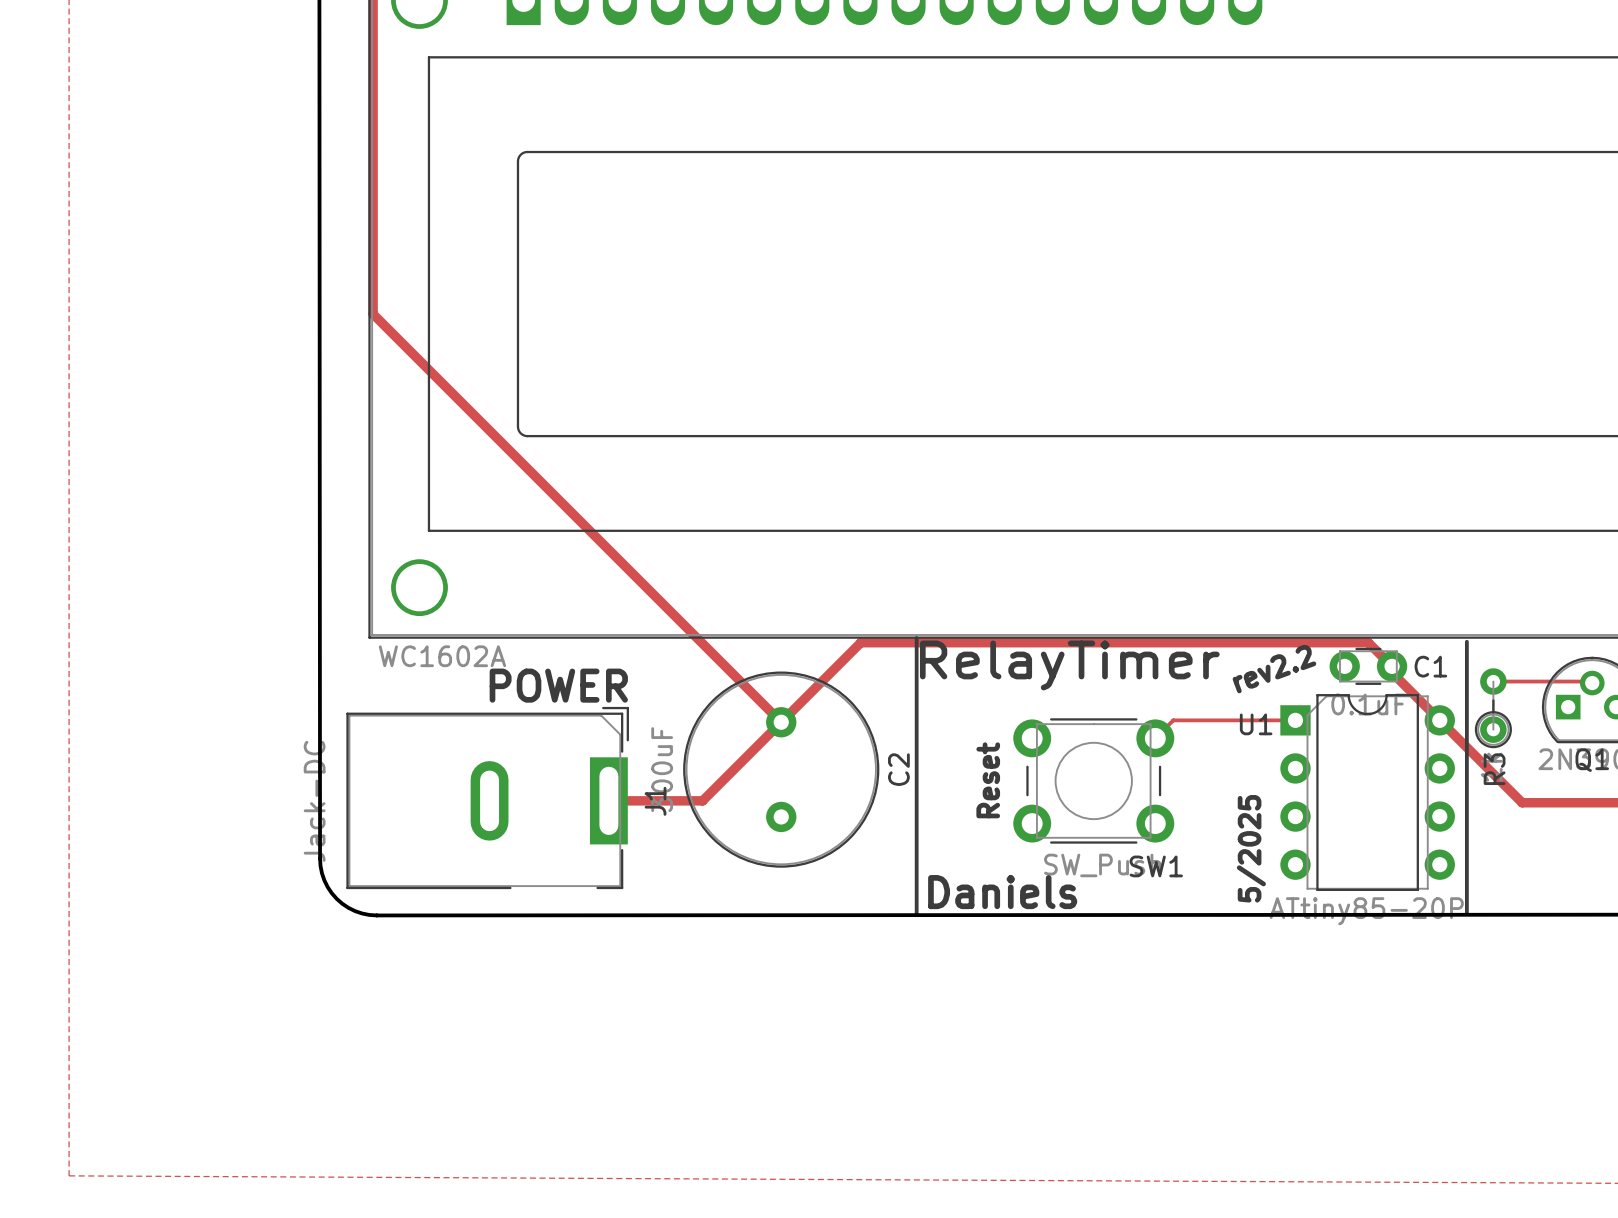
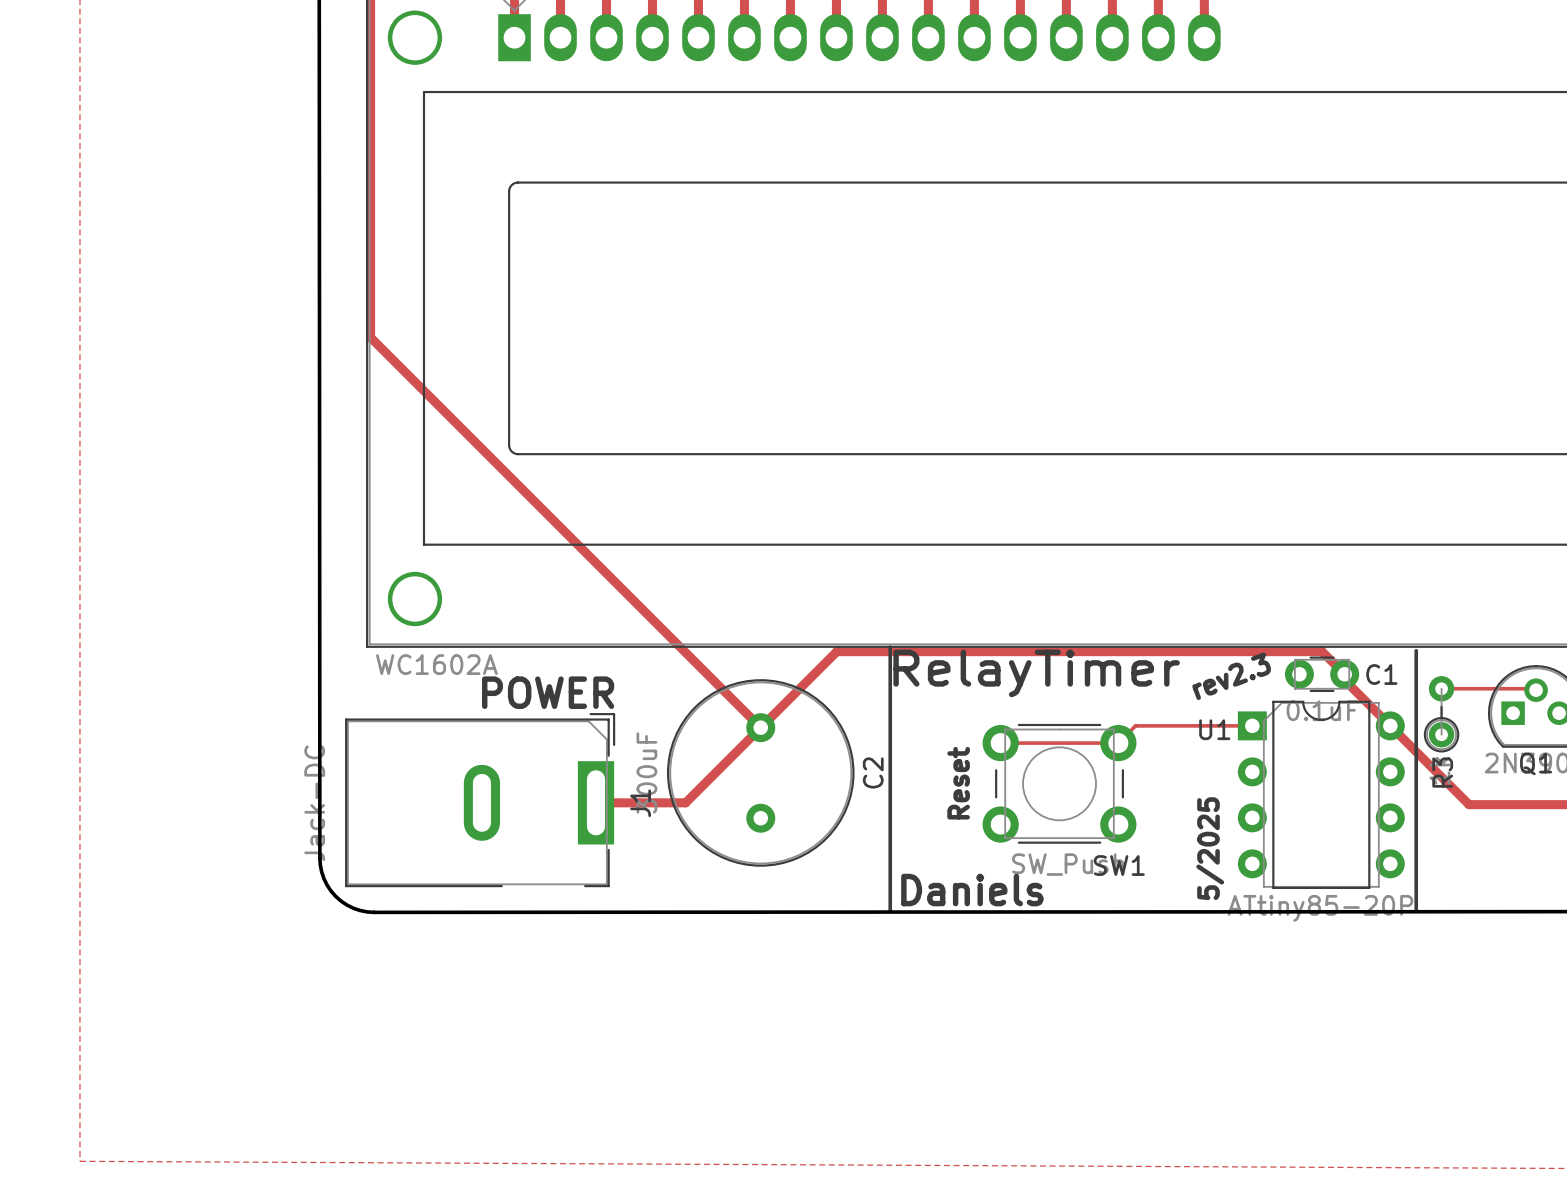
text: rev2.2 (1274, 669) -> rev2.3 (1231, 676)
track: none -> (1000, 743) (1118, 743)

